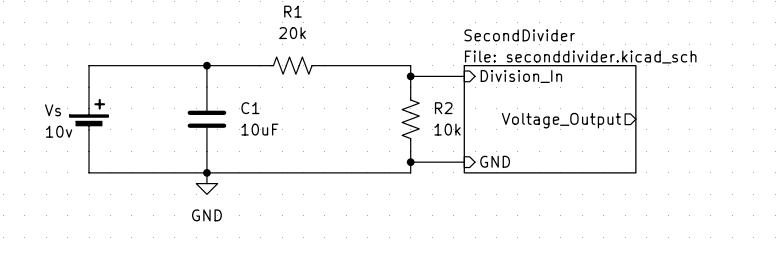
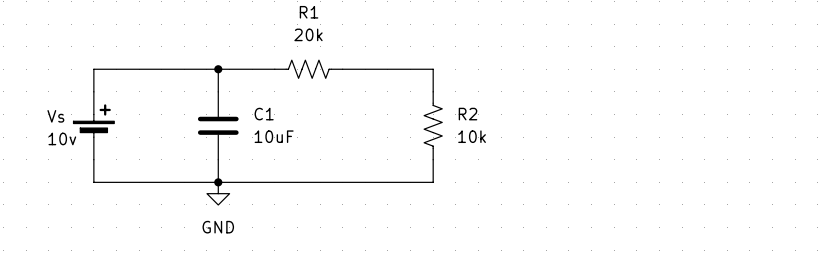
wire: (410, 76) (464, 76) -> none
junction: (410, 76) -> none
sheet pin: Division_In (521, 76) -> none
sheet SecondDivider: File: seconddivider.kicad_sch (550, 119) -> none
sheet pin: Voltage_Output (561, 120) -> none
sheet pin: GND (495, 161) -> none
wire: (410, 162) (464, 162) -> none
junction: (410, 162) -> none

